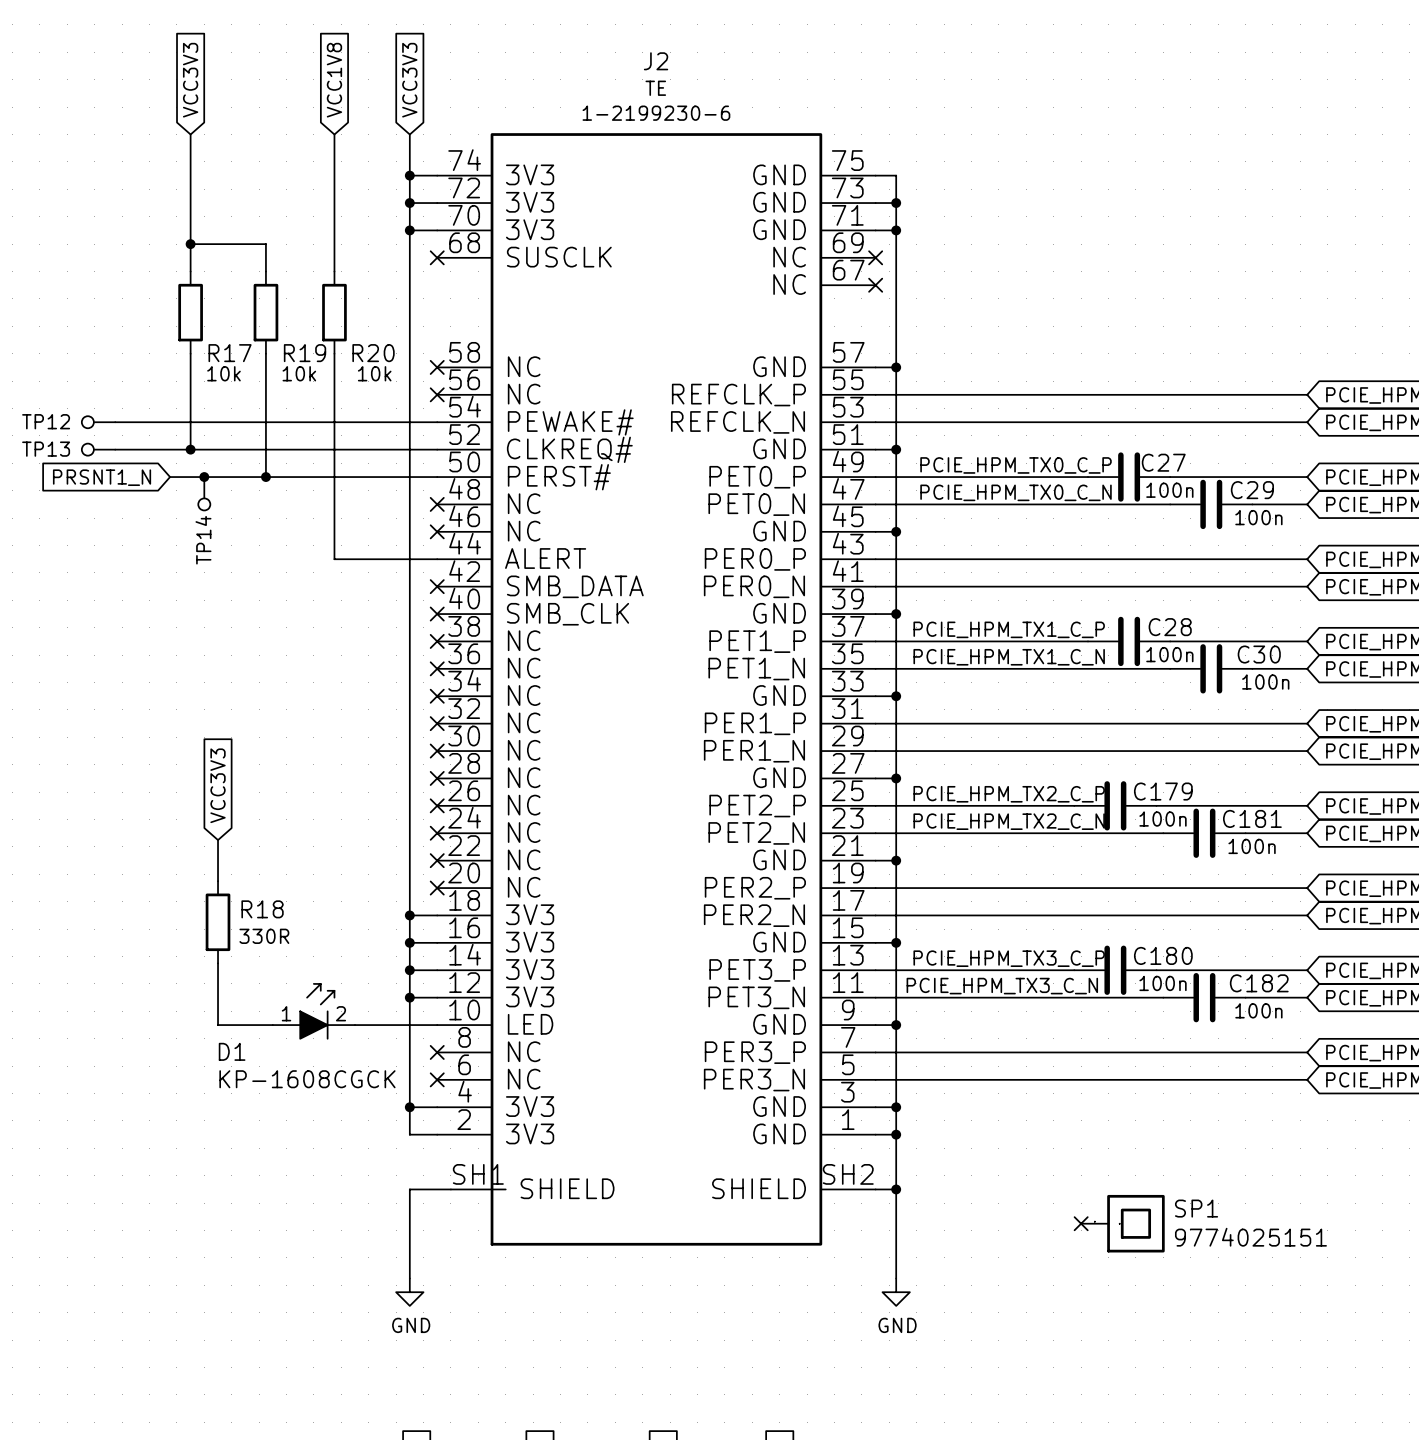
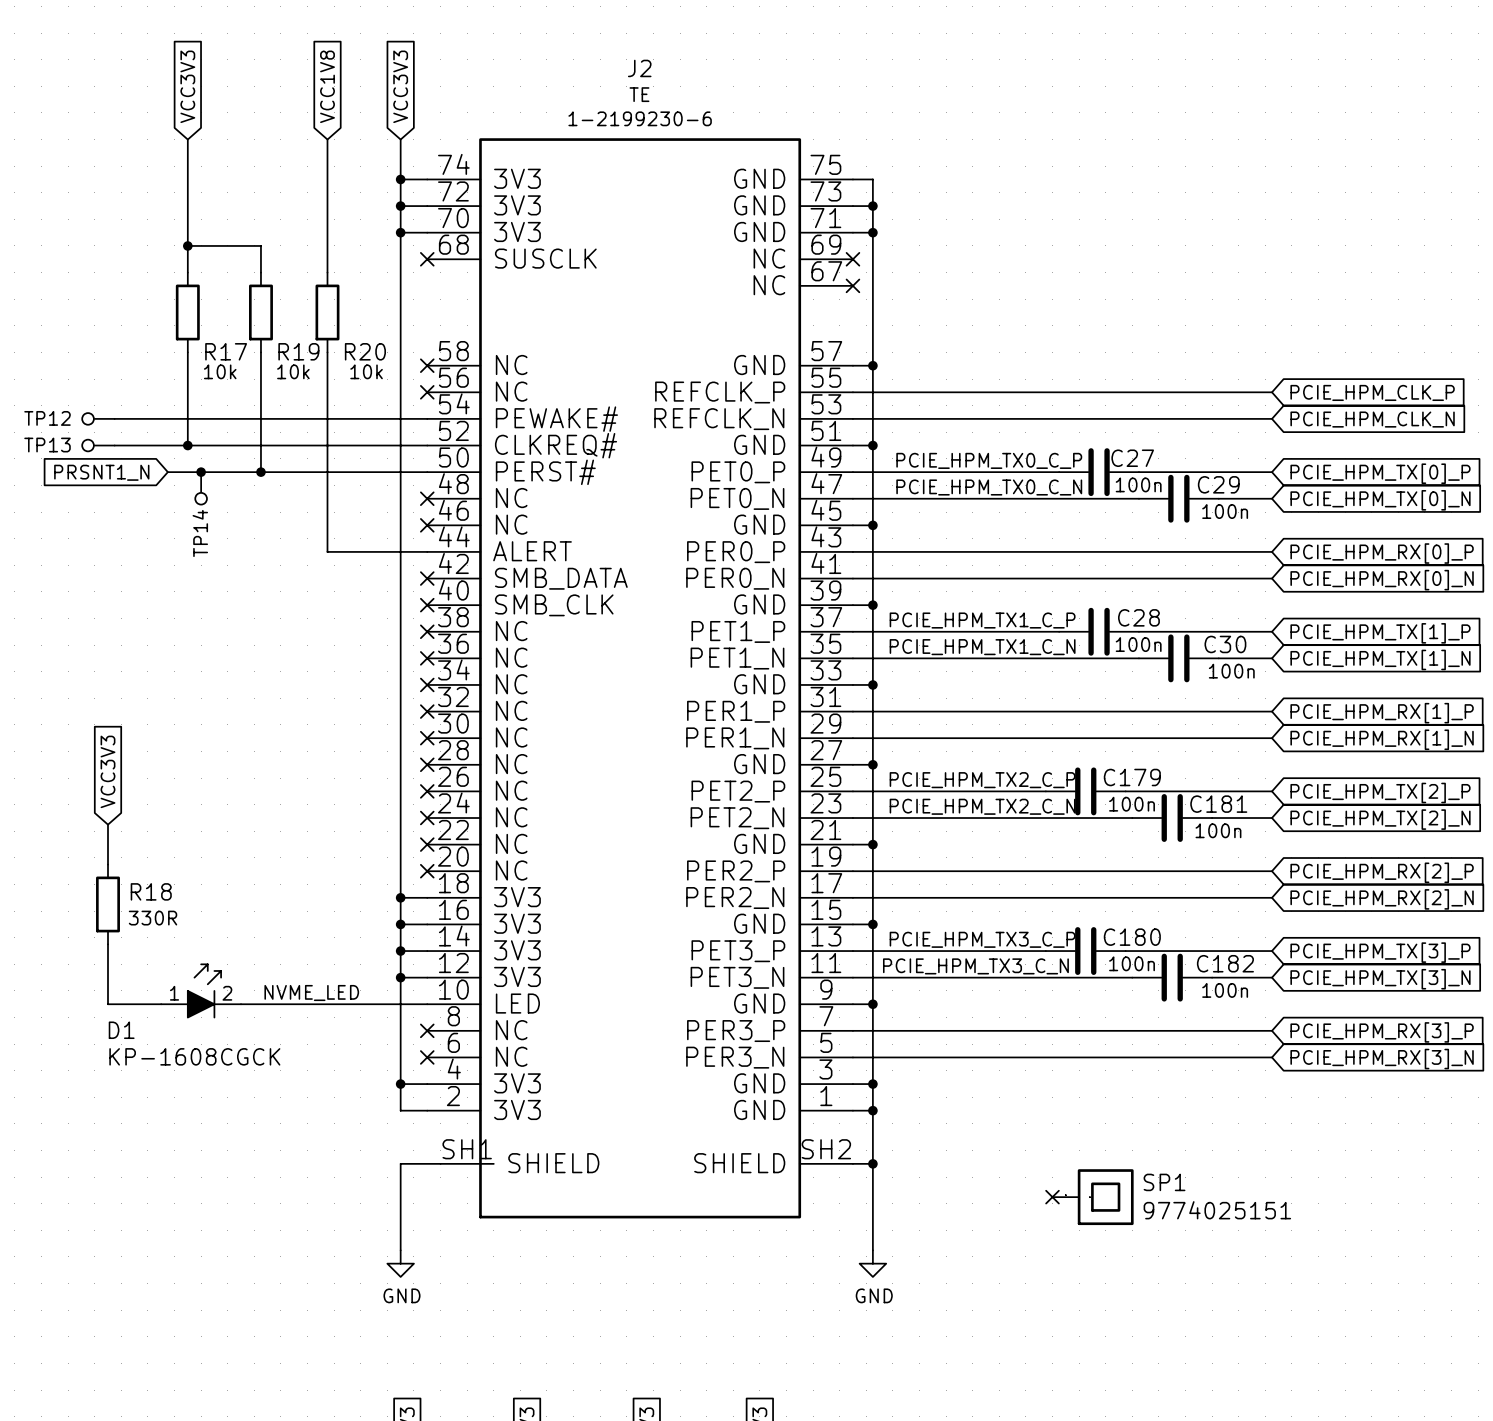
global label position: VCC3V3 (218, 785) -> VCC3V3 (107, 771)
wire: (218, 840) (218, 881) -> (107, 824) (107, 864)
R18 position: (218, 922) -> (107, 904)
wire: none -> (107, 944) (107, 1004) (161, 1004)
wire: (218, 963) (218, 1025) (245, 1025) -> none
D1 position: (313, 1011) -> (201, 990)
label: none -> NVME_LED (311, 993)

